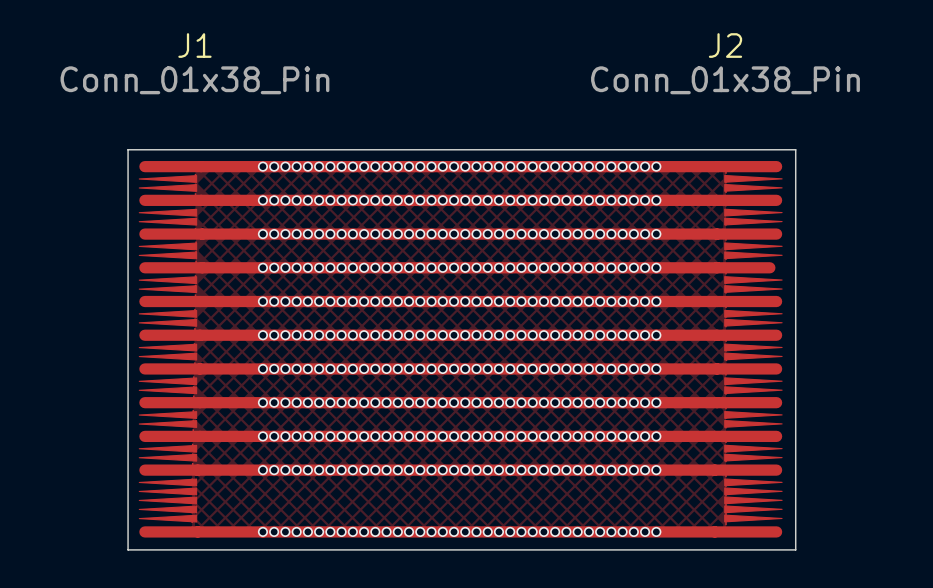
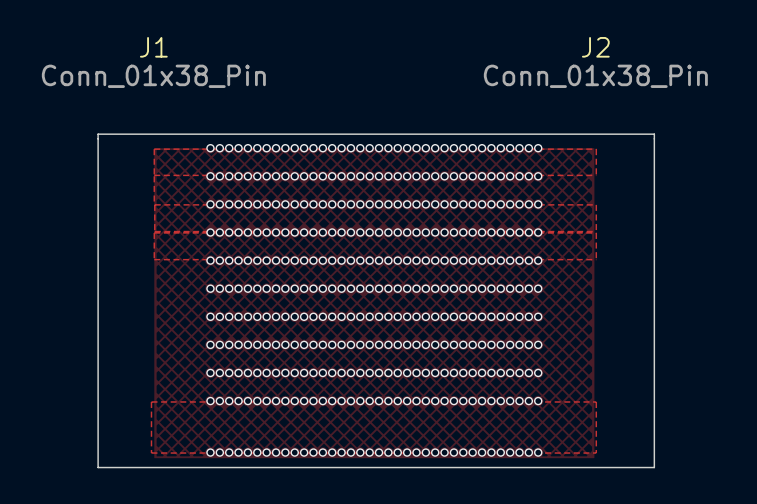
track: (144, 166) (776, 166) -> none
drawing: [724, 174, 783, 523] -> none
drawing: [138, 175, 198, 523] -> none
track: (144, 200) (776, 200) -> none
track: (144, 234) (776, 234) -> none
track: (144, 267) (769, 267) -> none
track: (144, 301) (776, 301) -> none
track: (144, 335) (776, 335) -> none
track: (144, 368) (776, 368) -> none
track: (144, 402) (776, 402) -> none
track: (144, 436) (776, 436) -> none
track: (144, 470) (776, 470) -> none
track: (144, 531) (776, 531) -> none

